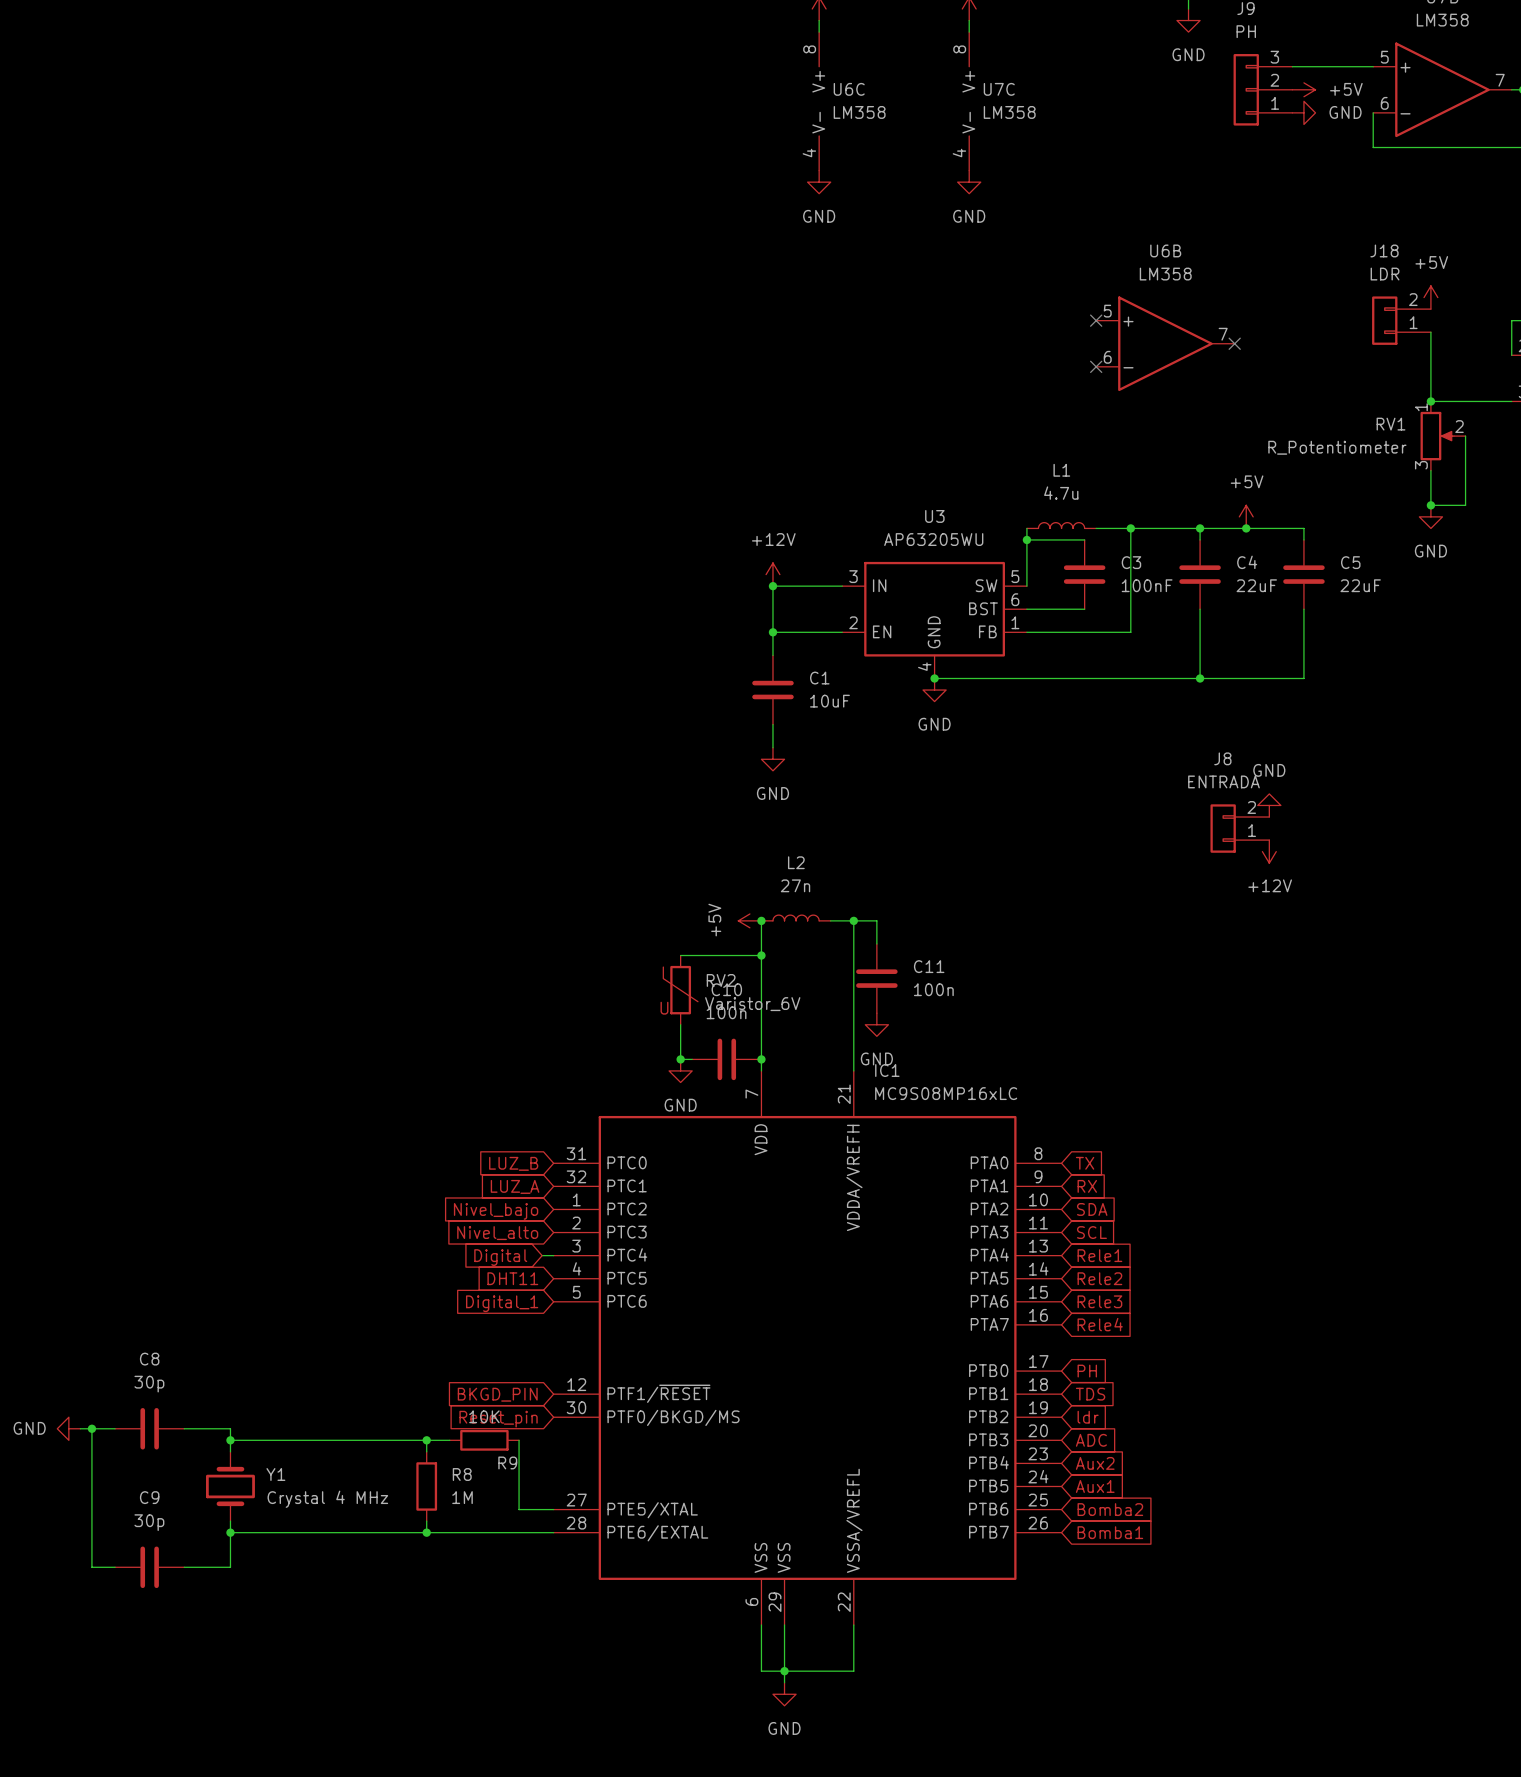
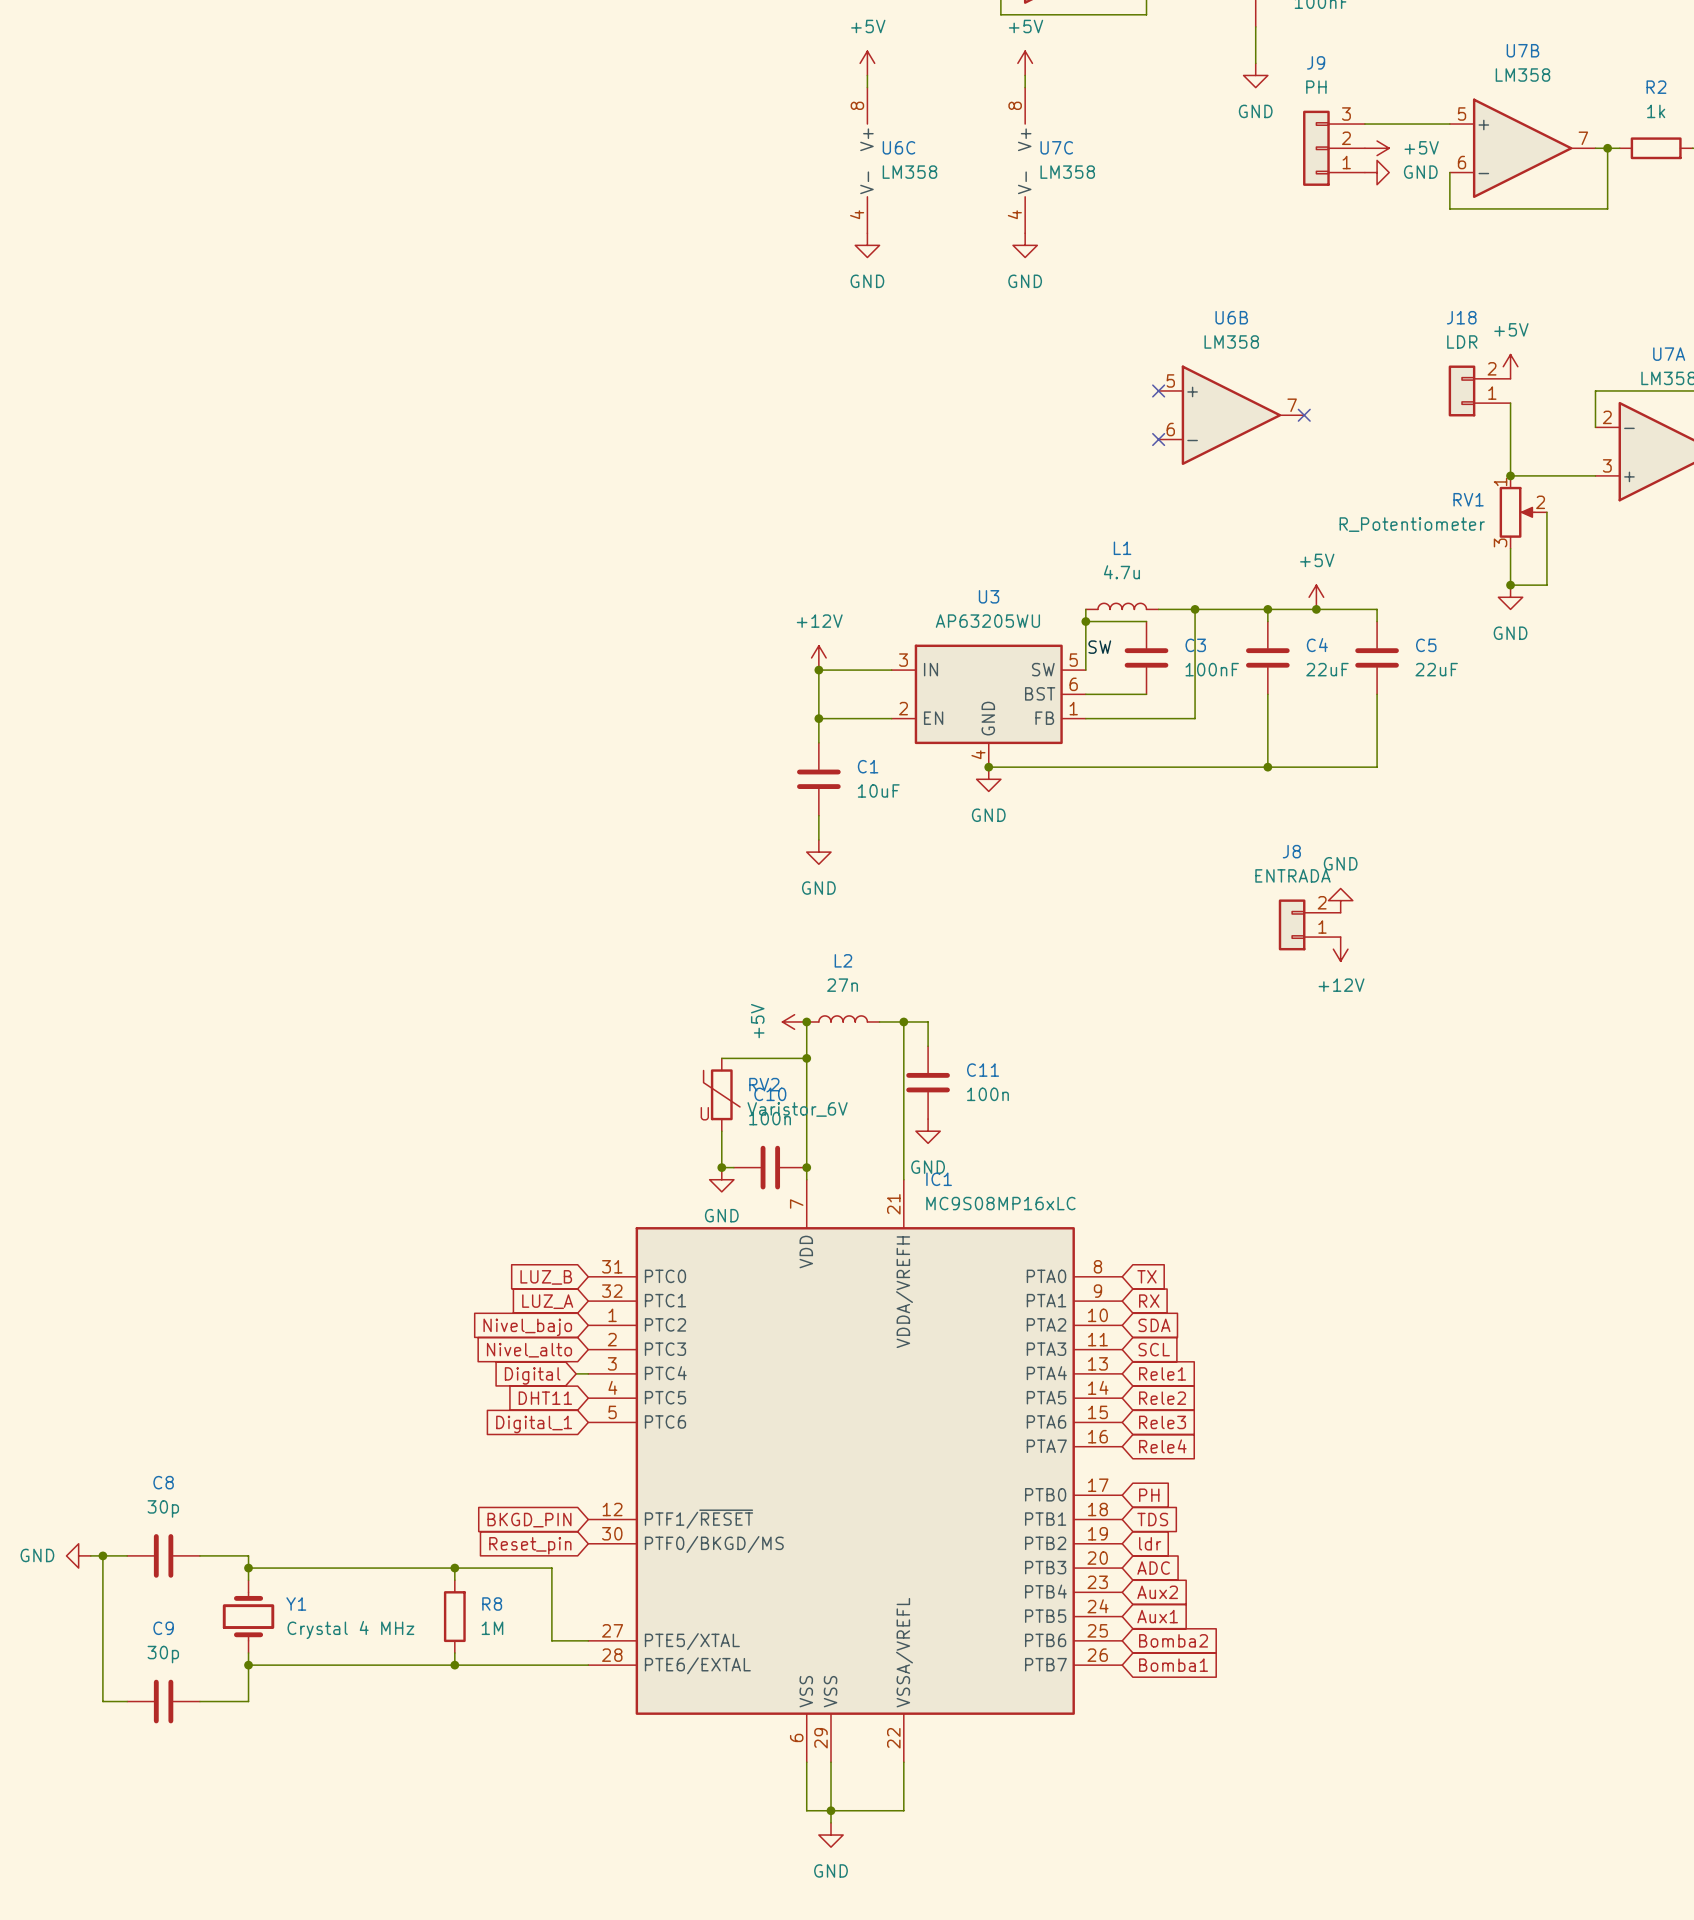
label: none -> SW (1099, 647)
wire: none -> (479, 1568) (551, 1568)
R9: 10K (484, 1440) -> none

